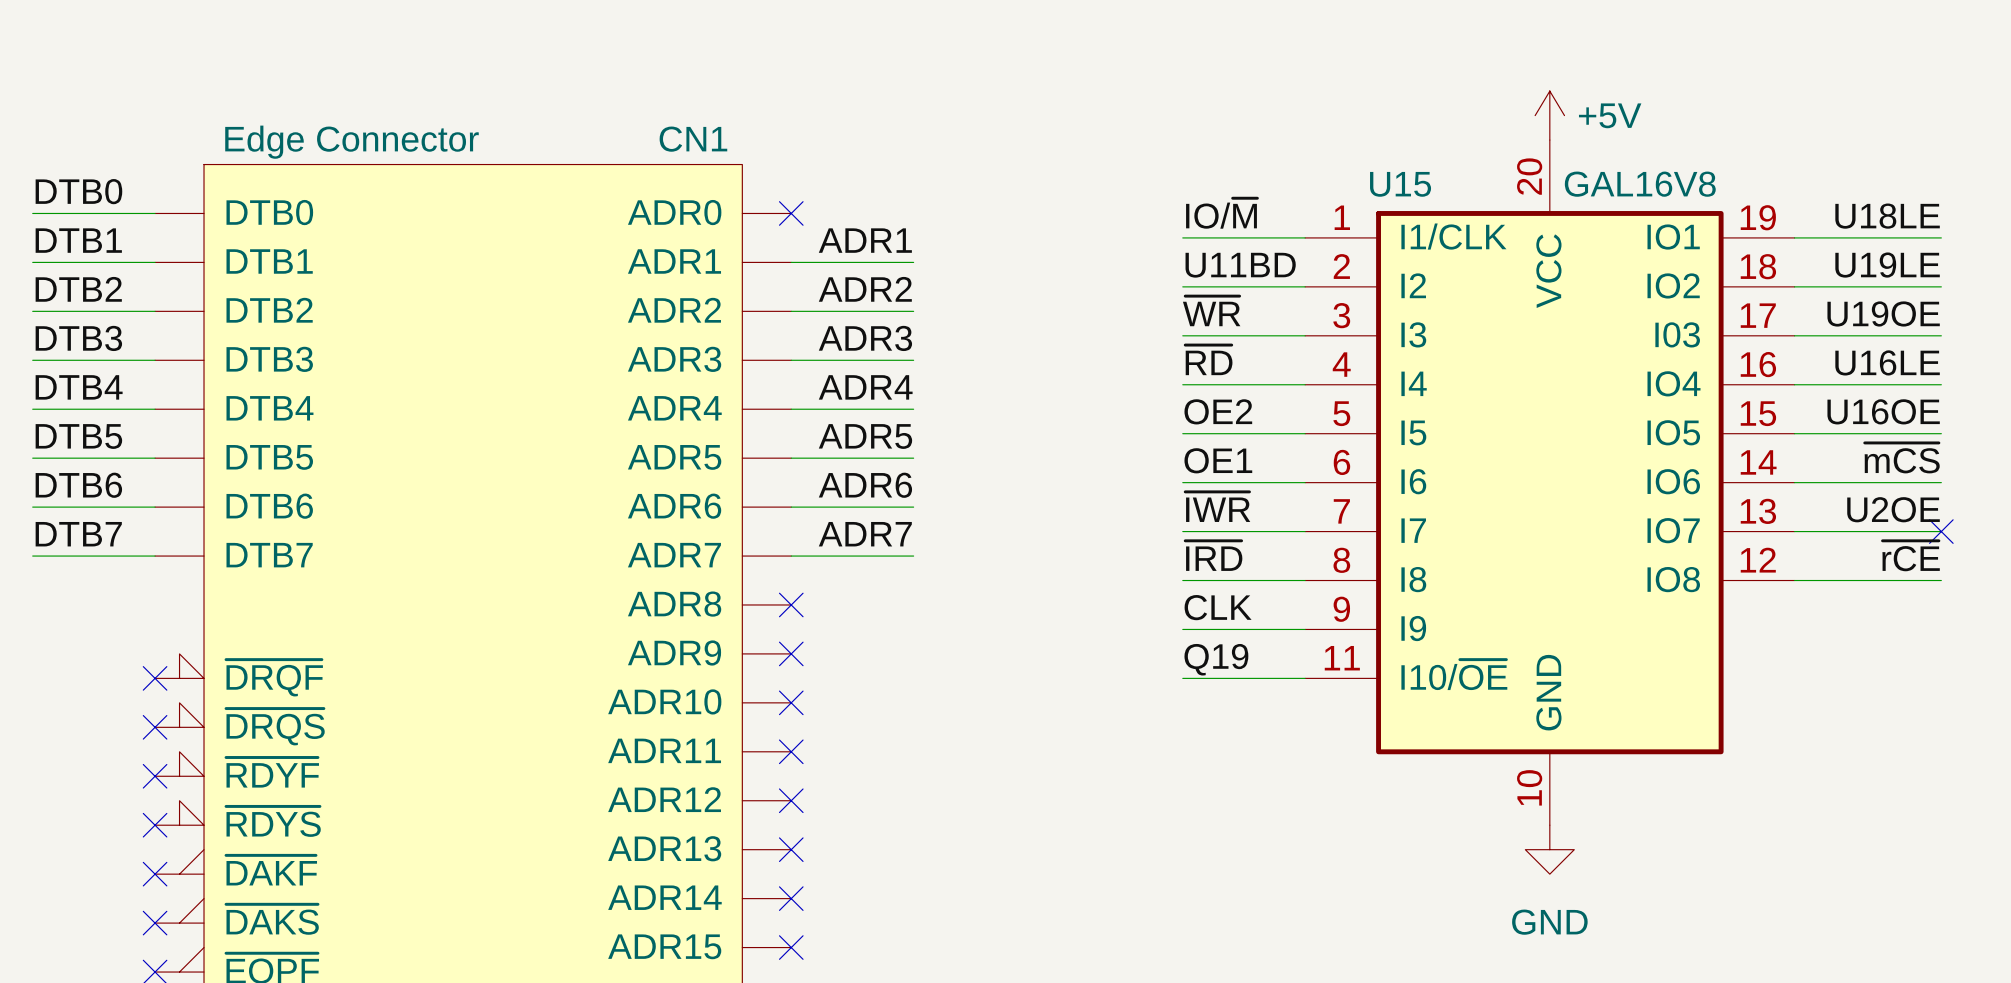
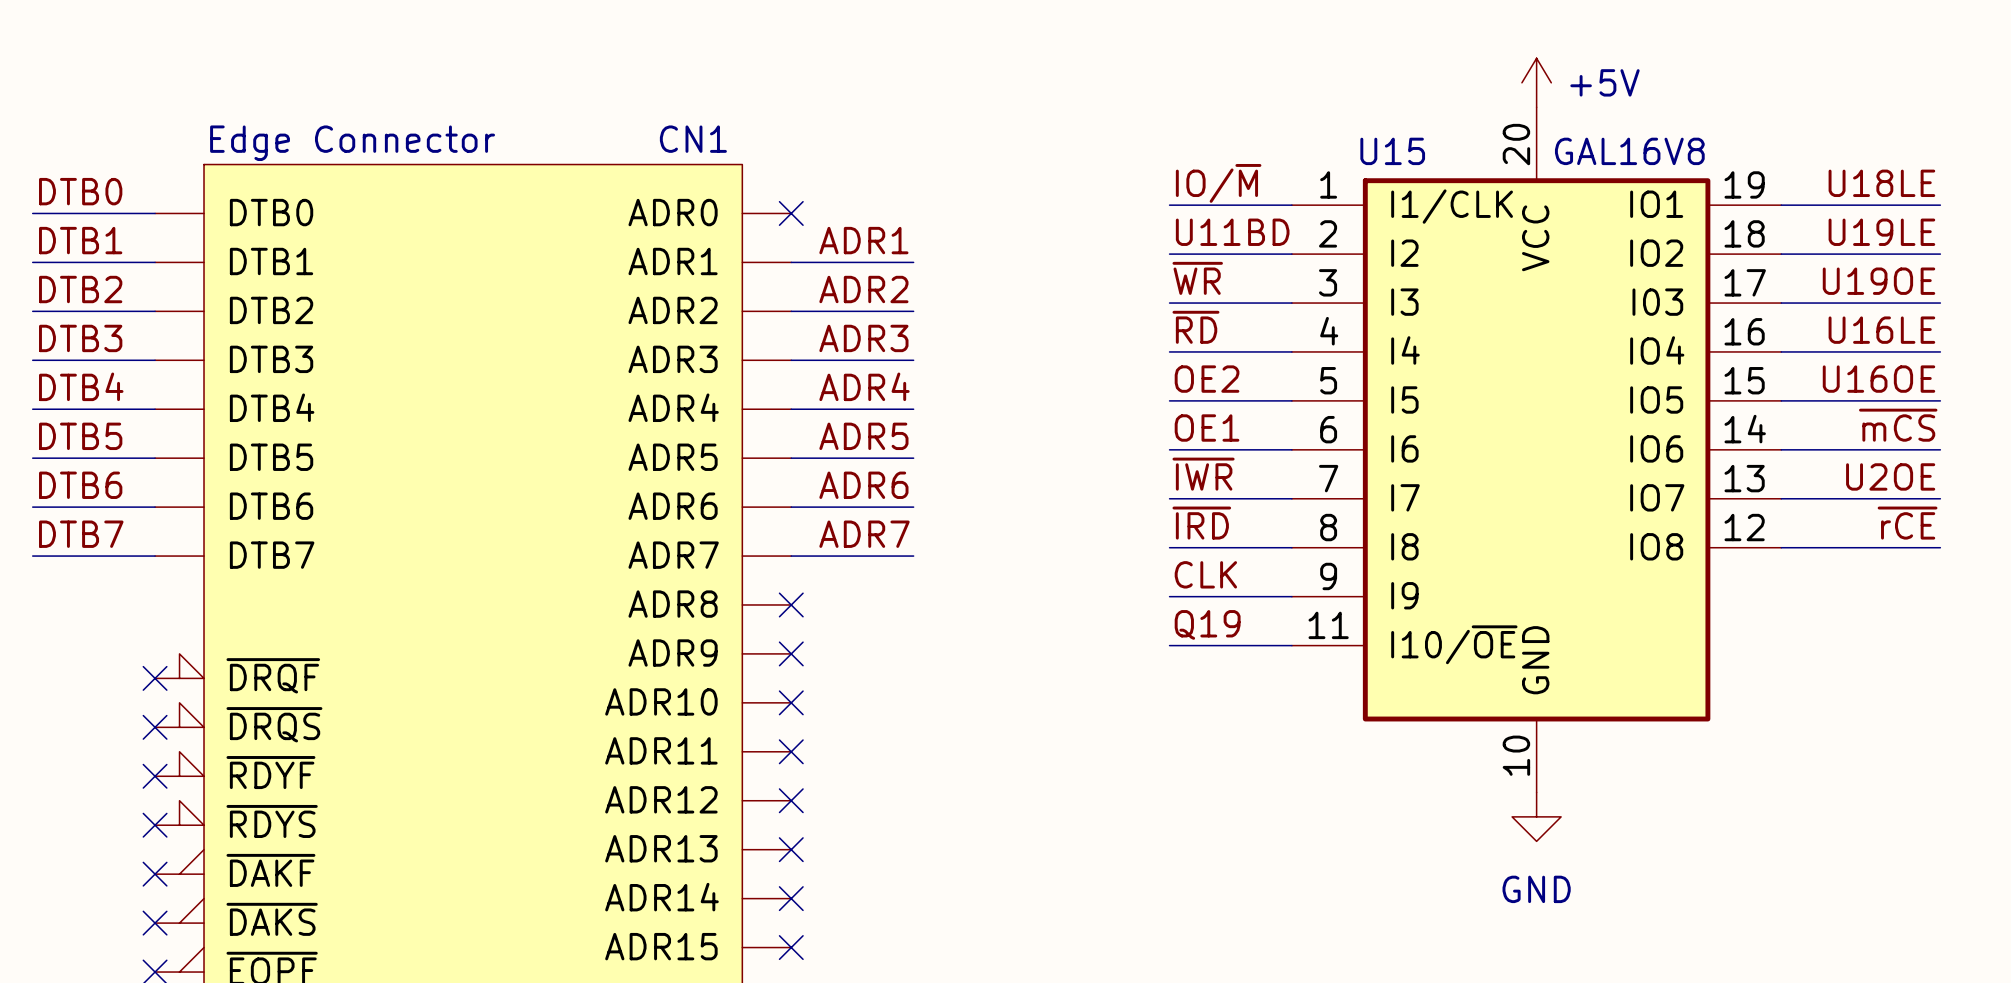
power symbol position: +5V (1549, 115) -> +5V (1536, 82)
wire: none -> (1781, 205) (1940, 205)
label position: IO/~{M} (1221, 213) -> IO/~{M} (1218, 183)
label position: U18LE (1887, 216) -> U18LE (1881, 183)
wire: (1182, 237) (1305, 237) -> (1169, 205) (1291, 205)
wire: (1794, 237) (1941, 237) -> none
wire: none -> (1781, 254) (1940, 254)
label position: U11BD (1240, 265) -> U11BD (1232, 232)
label position: U19LE (1887, 265) -> U19LE (1881, 232)
wire: (1182, 286) (1305, 286) -> (1169, 254) (1291, 254)
wire: (1794, 286) (1941, 286) -> none
wire: none -> (1781, 303) (1940, 303)
label position: ~{WR} (1211, 311) -> ~{WR} (1197, 278)
label position: U19OE (1883, 313) -> U19OE (1879, 281)
wire: (1182, 335) (1305, 335) -> (1169, 303) (1291, 303)
wire: (1794, 335) (1941, 335) -> none
wire: none -> (1781, 351) (1940, 351)
label position: ~{RD} (1208, 360) -> ~{RD} (1195, 327)
label position: U16LE (1887, 362) -> U16LE (1881, 330)
wire: (1182, 384) (1305, 384) -> (1169, 351) (1291, 351)
wire: (1794, 384) (1941, 384) -> none
wire: none -> (1781, 400) (1940, 400)
label position: OE2 (1218, 411) -> OE2 (1207, 379)
label position: U16OE (1883, 411) -> U16OE (1879, 379)
wire: (1182, 433) (1305, 433) -> (1169, 400) (1291, 400)
wire: (1794, 433) (1941, 433) -> none
wire: none -> (1781, 449) (1940, 449)
label position: ~{mCS} (1902, 458) -> ~{mCS} (1898, 425)
label position: OE1 (1218, 460) -> OE1 (1207, 428)
wire: (1182, 482) (1305, 482) -> (1169, 449) (1291, 449)
U15 position: (1549, 482) -> (1536, 449)
wire: (1794, 482) (1941, 482) -> none
wire: none -> (1781, 498) (1940, 498)
label position: ~{IWR} (1217, 506) -> ~{IWR} (1203, 474)
label position: U2OE (1893, 509) -> U2OE (1890, 476)
wire: (1182, 531) (1305, 531) -> (1169, 498) (1291, 498)
wire: (1794, 531) (1941, 531) -> none
no-connect mark: (1941, 531) -> none
wire: none -> (1781, 547) (1940, 547)
label position: ~{IRD} (1213, 555) -> ~{IRD} (1201, 523)
label position: ~{rCE} (1911, 556) -> ~{rCE} (1907, 523)
wire: (1182, 580) (1305, 580) -> (1169, 547) (1291, 547)
wire: (1794, 580) (1941, 580) -> none
label position: CLK (1218, 607) -> CLK (1205, 574)
wire: (1182, 629) (1305, 629) -> (1169, 596) (1291, 596)
label position: Q19 (1216, 659) -> Q19 (1207, 624)
wire: (1182, 678) (1305, 678) -> (1169, 645) (1291, 645)
power symbol position: GND (1549, 849) -> GND (1536, 816)

